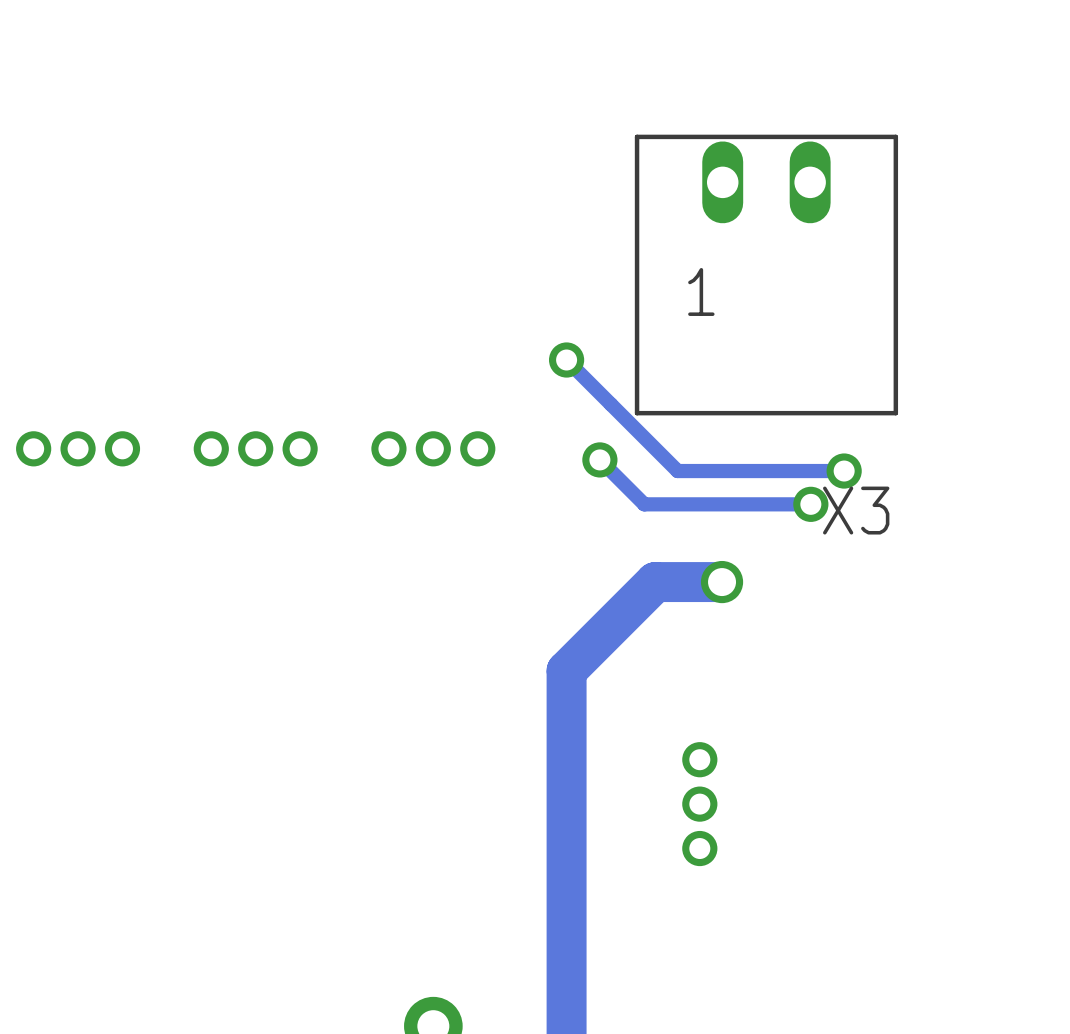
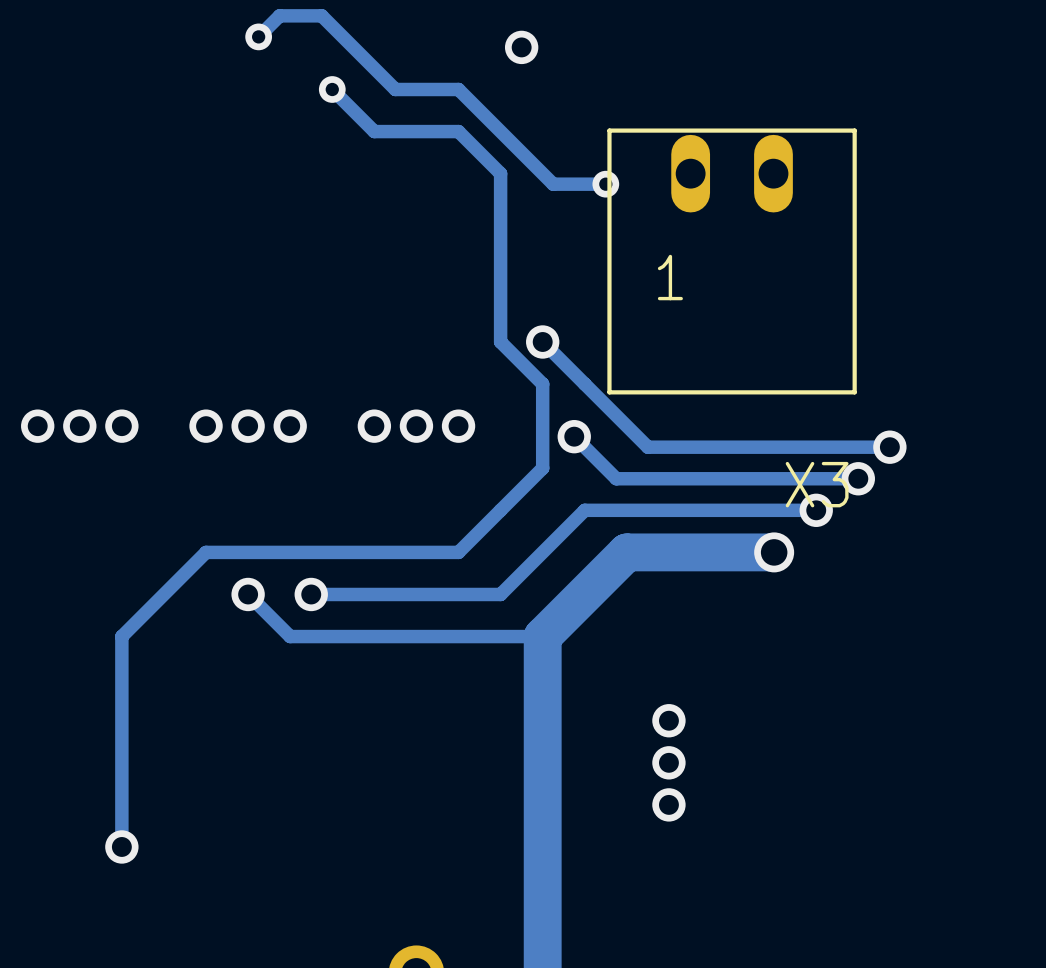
track: none -> (258, 36) (279, 15) (321, 15) (395, 89) (458, 89) (553, 184) (605, 184)
via: none -> (258, 36)
via: none -> (521, 47)
track: none -> (332, 89) (374, 131) (458, 131) (500, 173) (500, 341) (542, 384) (542, 468) (458, 552) (206, 552) (121, 636) (121, 846)
via: none -> (332, 89)
via: none -> (605, 184)
via: (844, 471) -> none
track: none -> (889, 447) (805, 447)
via: none -> (889, 447)
via: (810, 504) -> none
track: none -> (858, 478) (774, 478)
via: none -> (858, 478)
track: none -> (816, 510) (584, 510) (500, 594) (311, 594)
via: none -> (816, 510)
via position: (722, 582) -> (774, 552)
track: none -> (774, 552) (689, 552)
track: none -> (248, 594) (290, 636) (542, 636)
via: none -> (248, 594)
via: none -> (311, 594)
via: none -> (121, 846)

